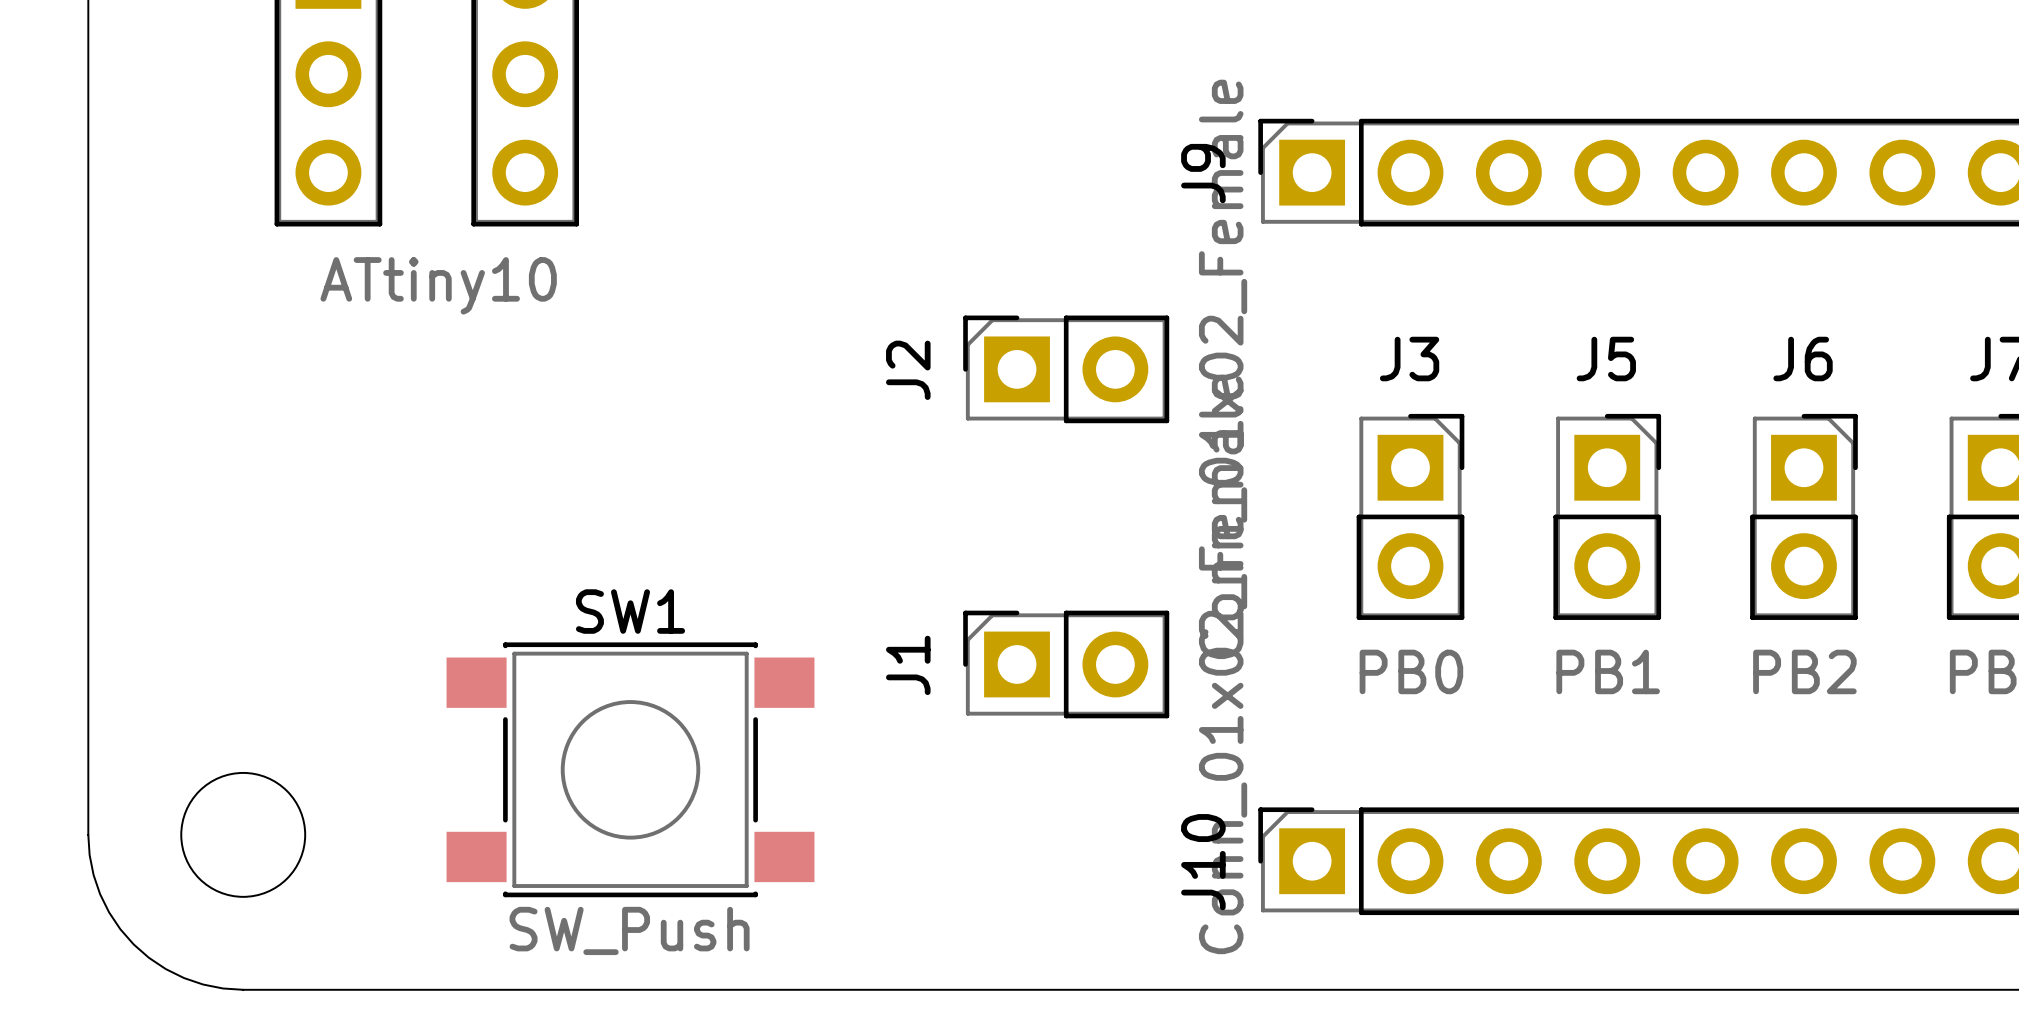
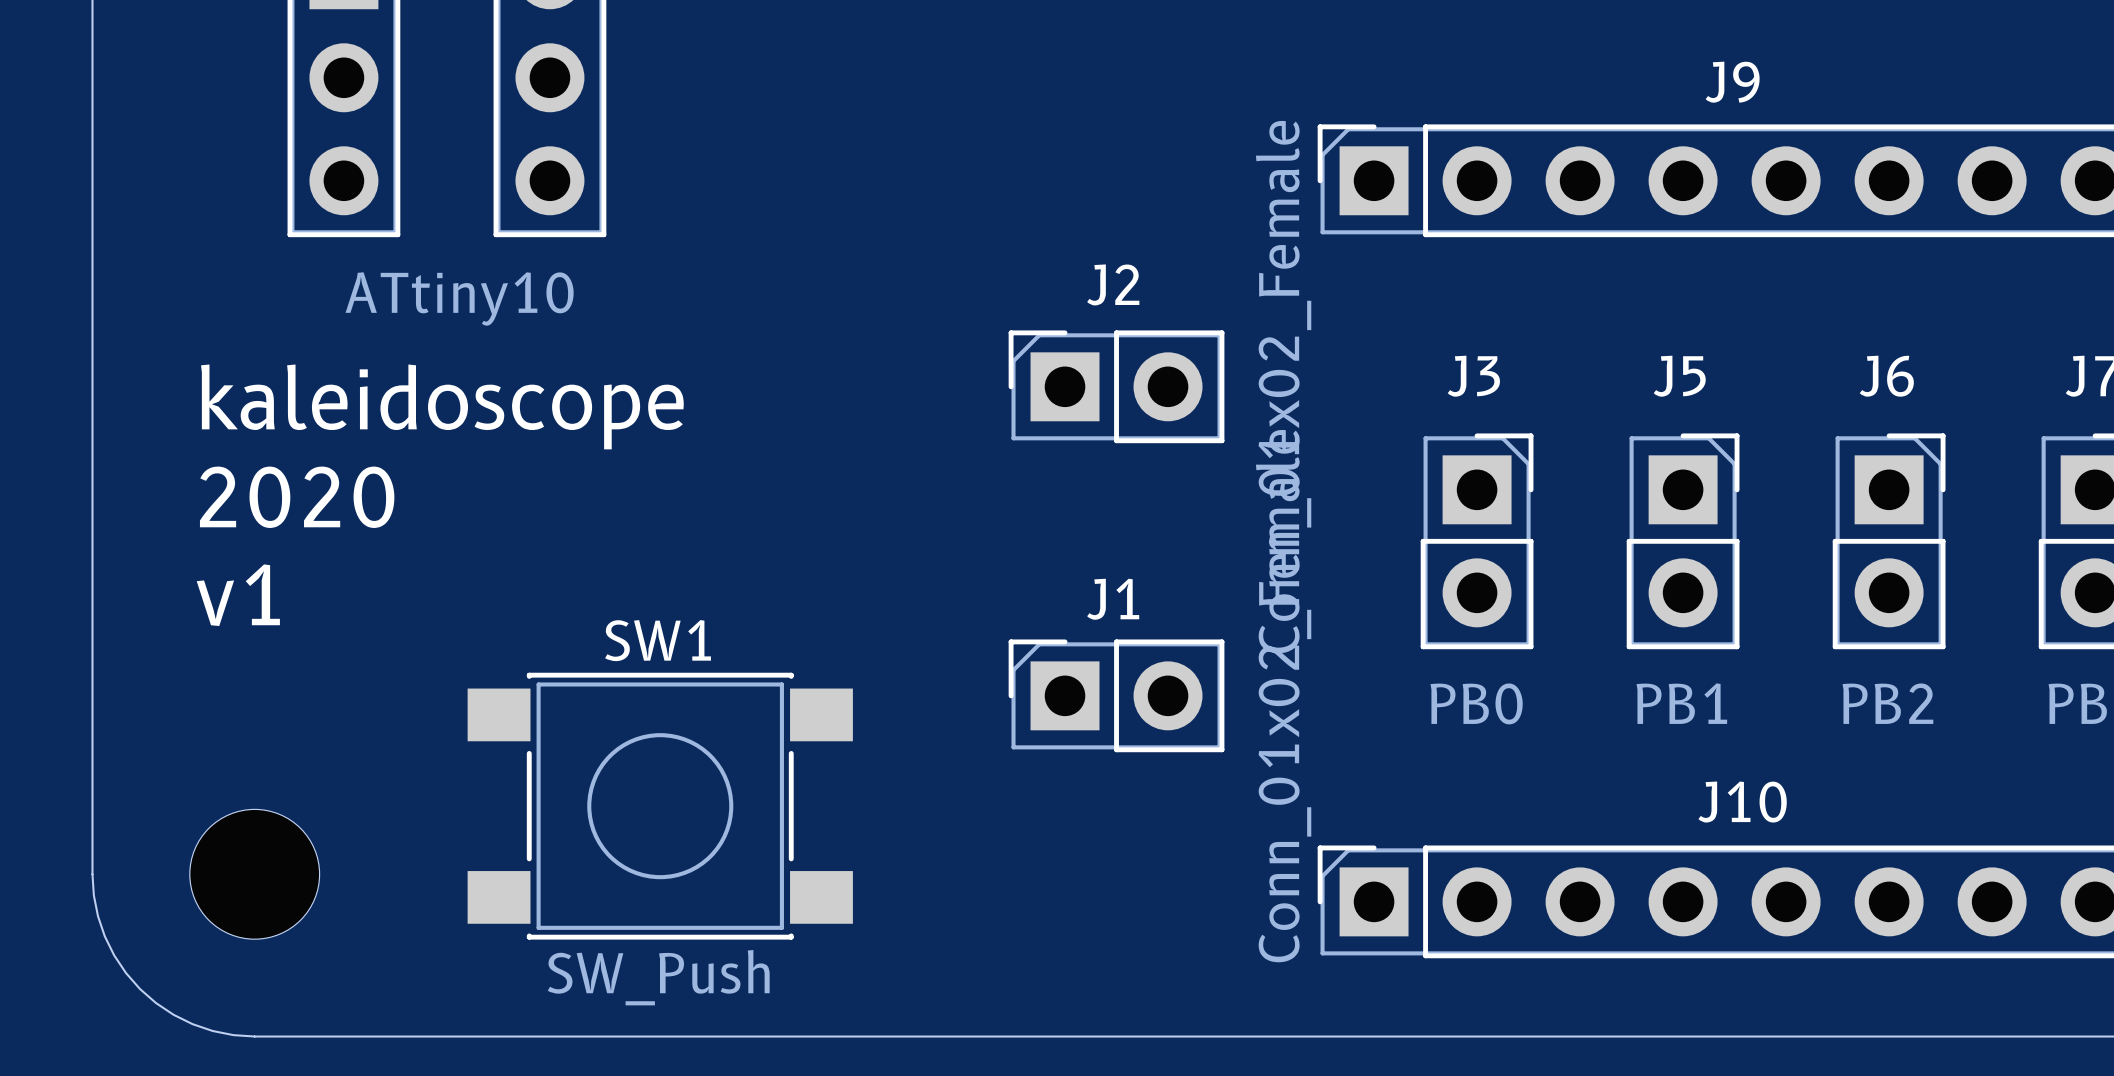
J9 name rotation: 0° (1203, 173) -> 90° clockwise (1732, 82)
J9 name position: J9 (1203, 173) -> J9 (1732, 82)
J2 name rotation: 0° (908, 370) -> 90° clockwise (1113, 284)
J2 name position: J2 (908, 370) -> J2 (1113, 284)
text: none -> kaleidoscope (442, 406)
text: none -> 2020 (297, 497)
text: none -> v1 (238, 595)
J1 name rotation: 0° (908, 665) -> 90° clockwise (1113, 599)
J1 name position: J1 (908, 665) -> J1 (1113, 599)
J10 name rotation: 0° (1203, 862) -> 90° clockwise (1742, 802)
J10 name position: J10 (1203, 862) -> J10 (1742, 802)

